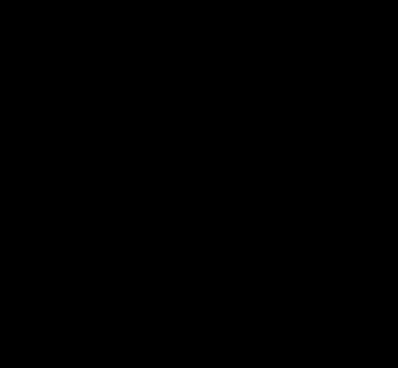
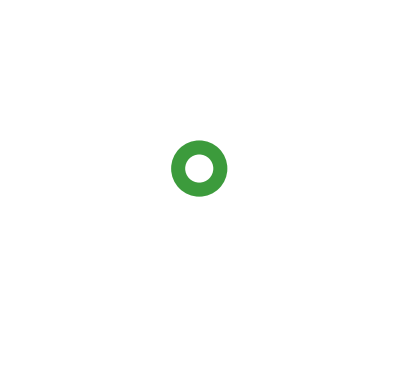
via: none -> (199, 168)

